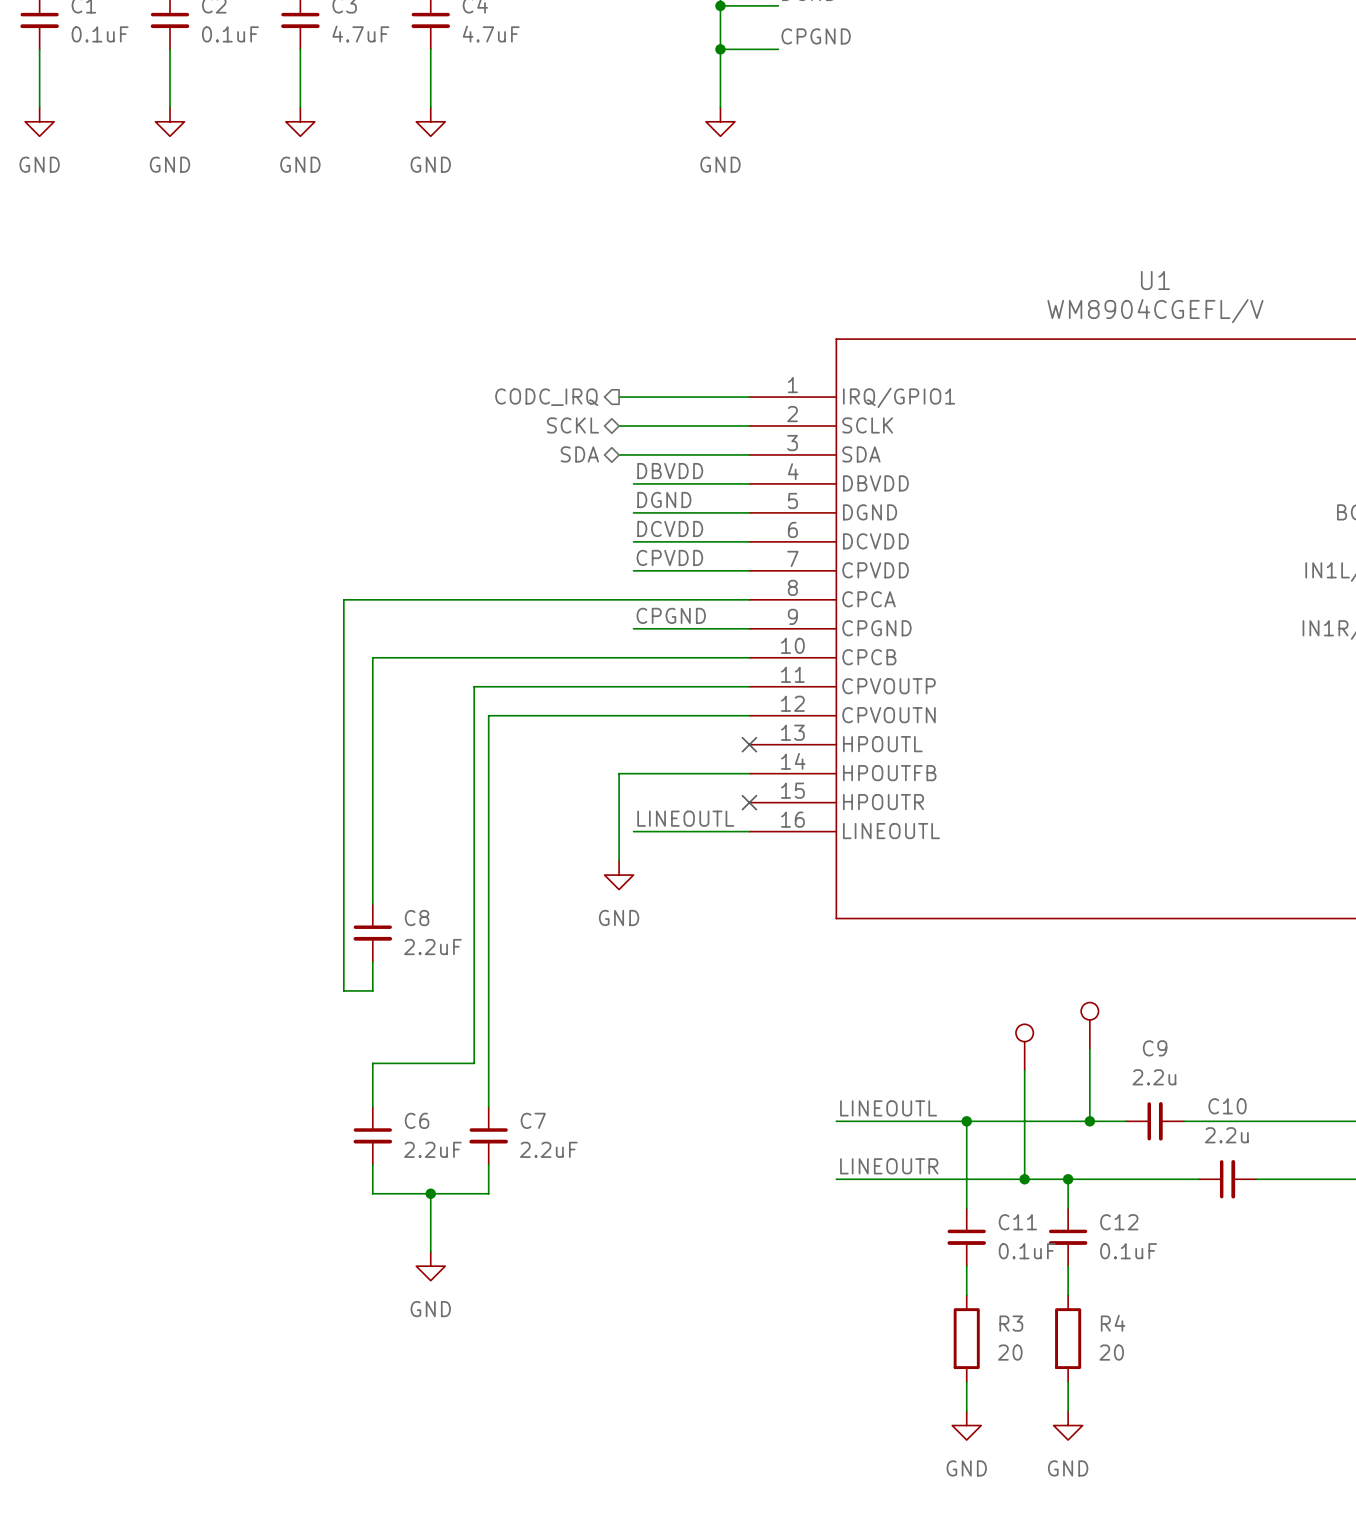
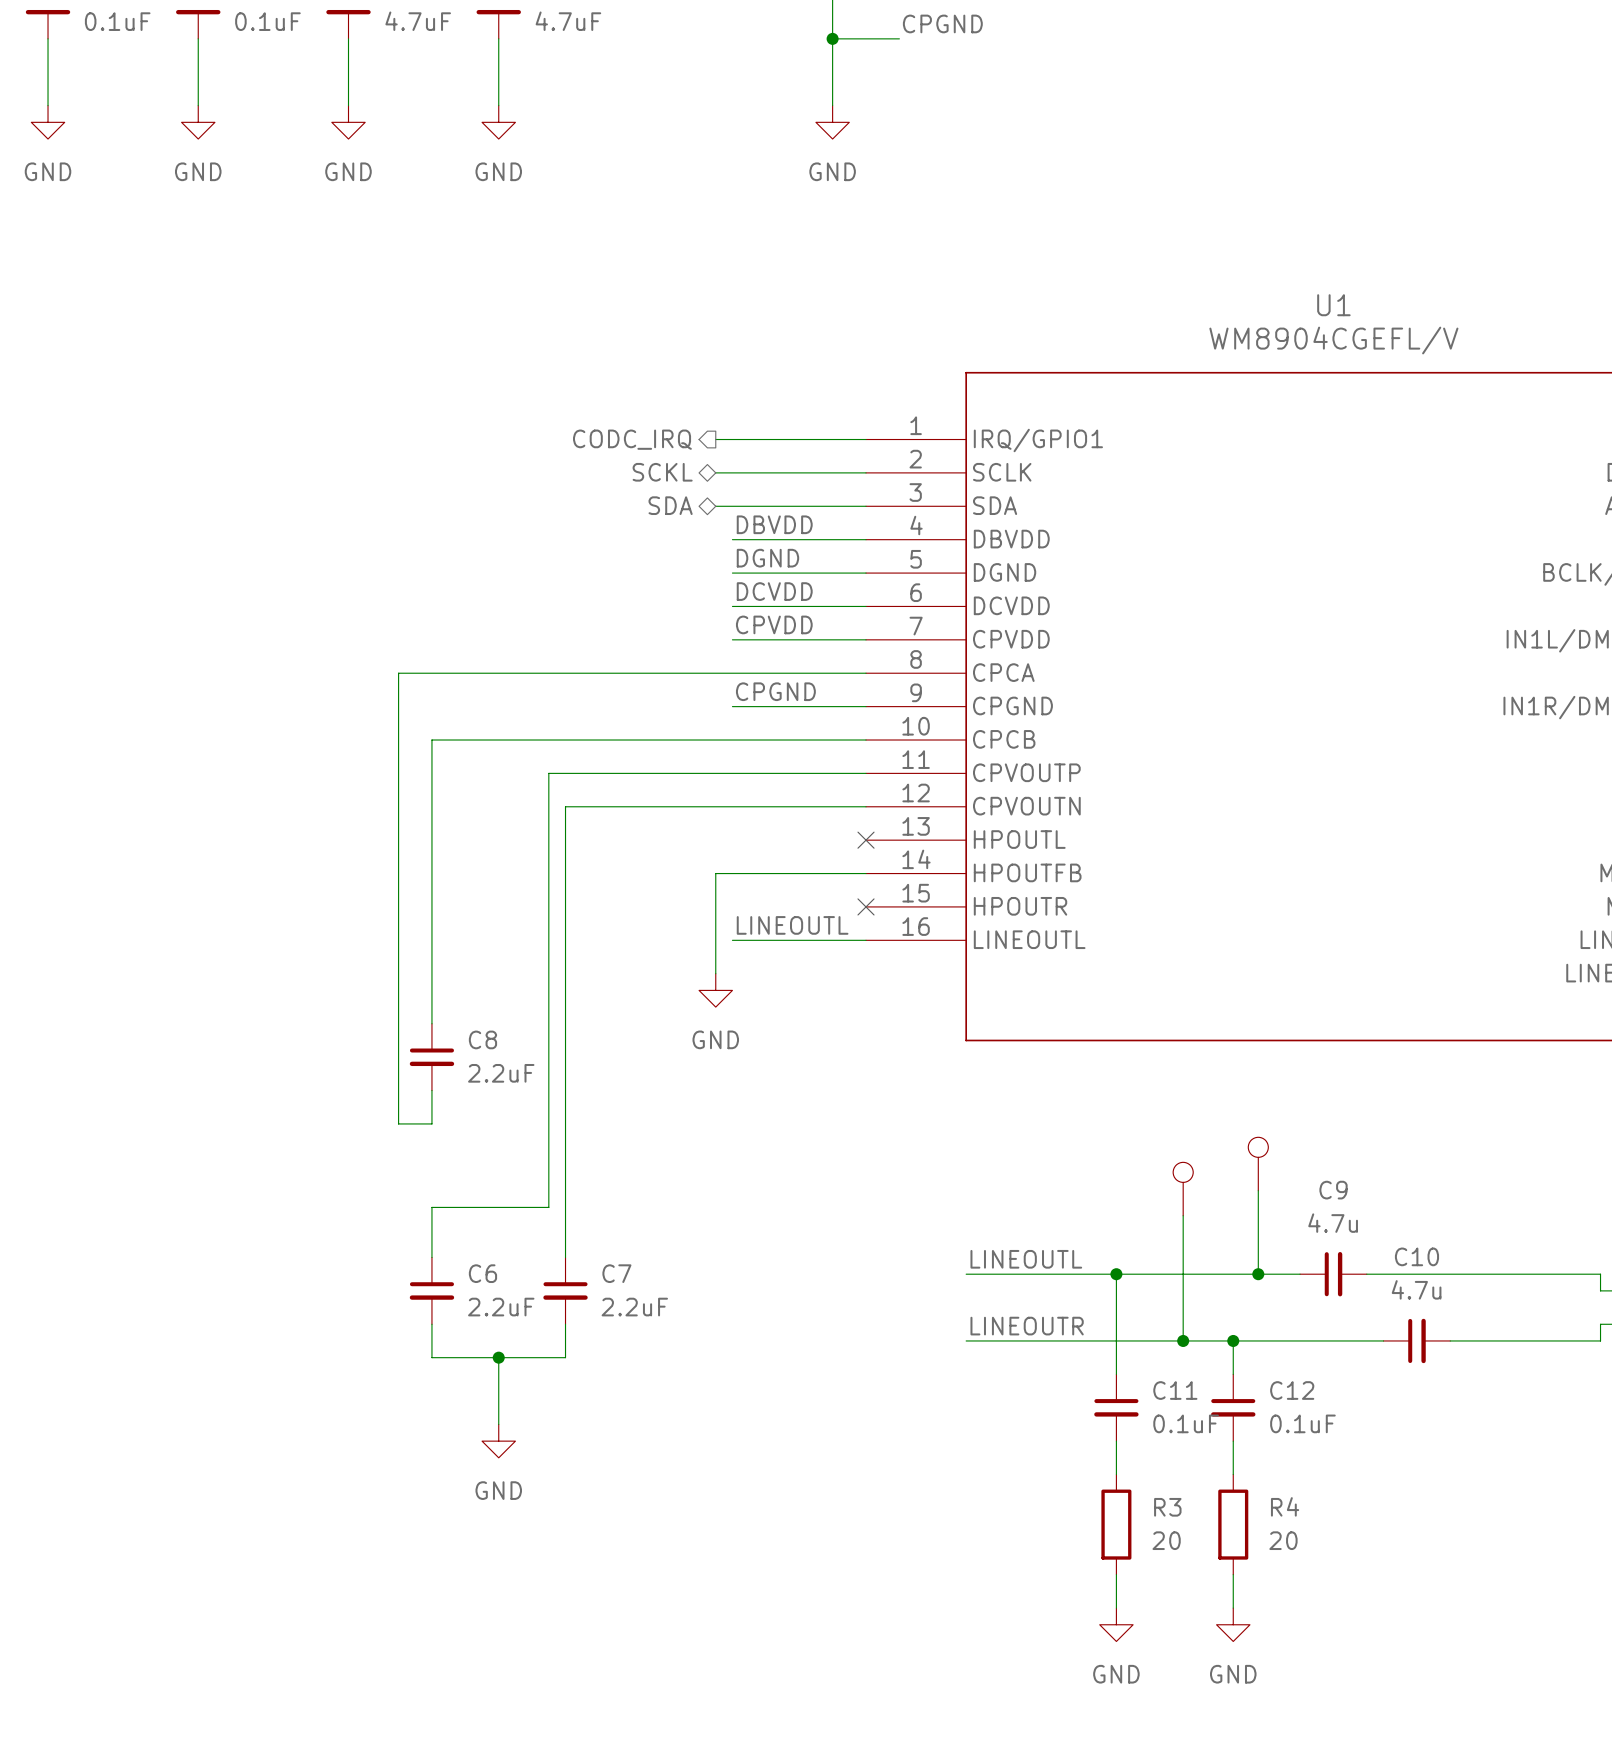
C9 value: 2.2u (1154, 1077) -> 4.7u (1333, 1223)
C10 value: 2.2u (1226, 1135) -> 4.7u (1416, 1289)

